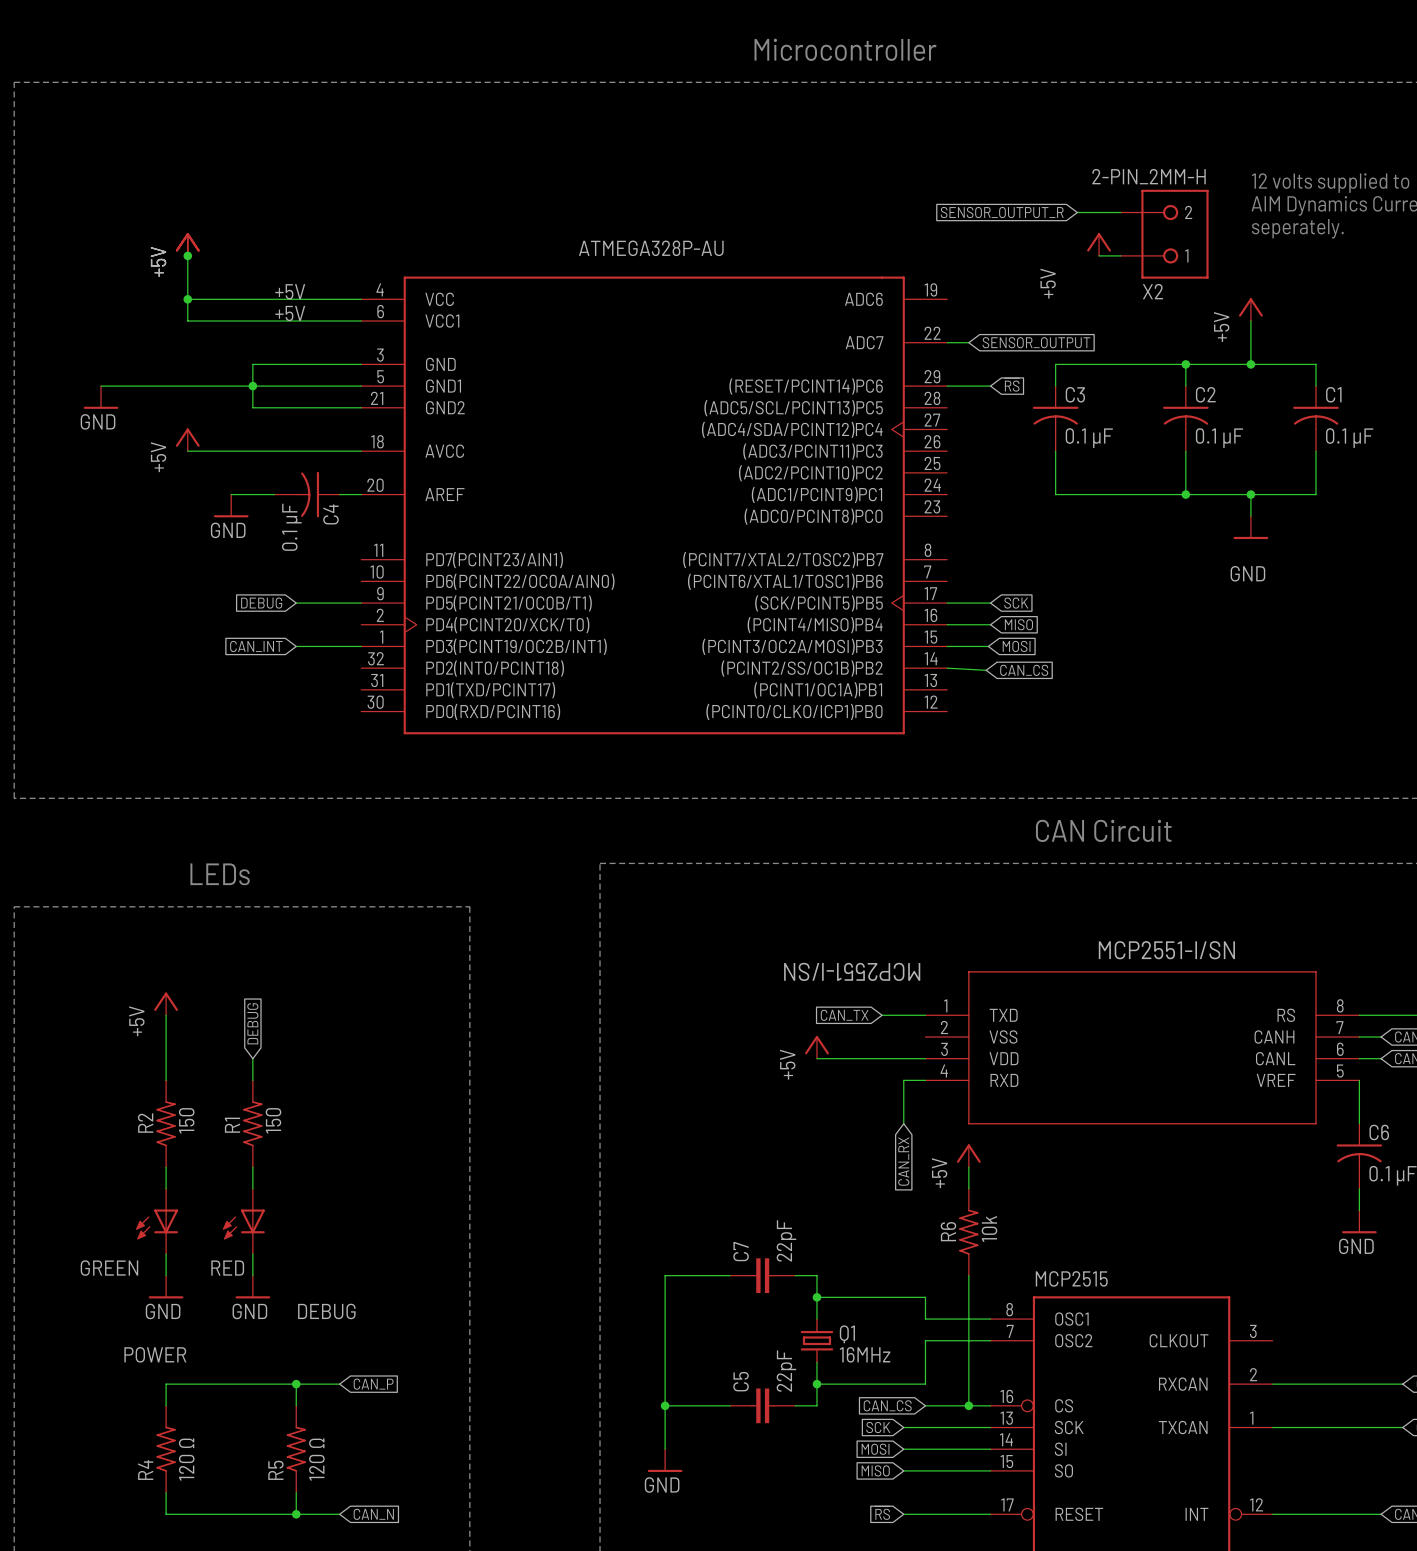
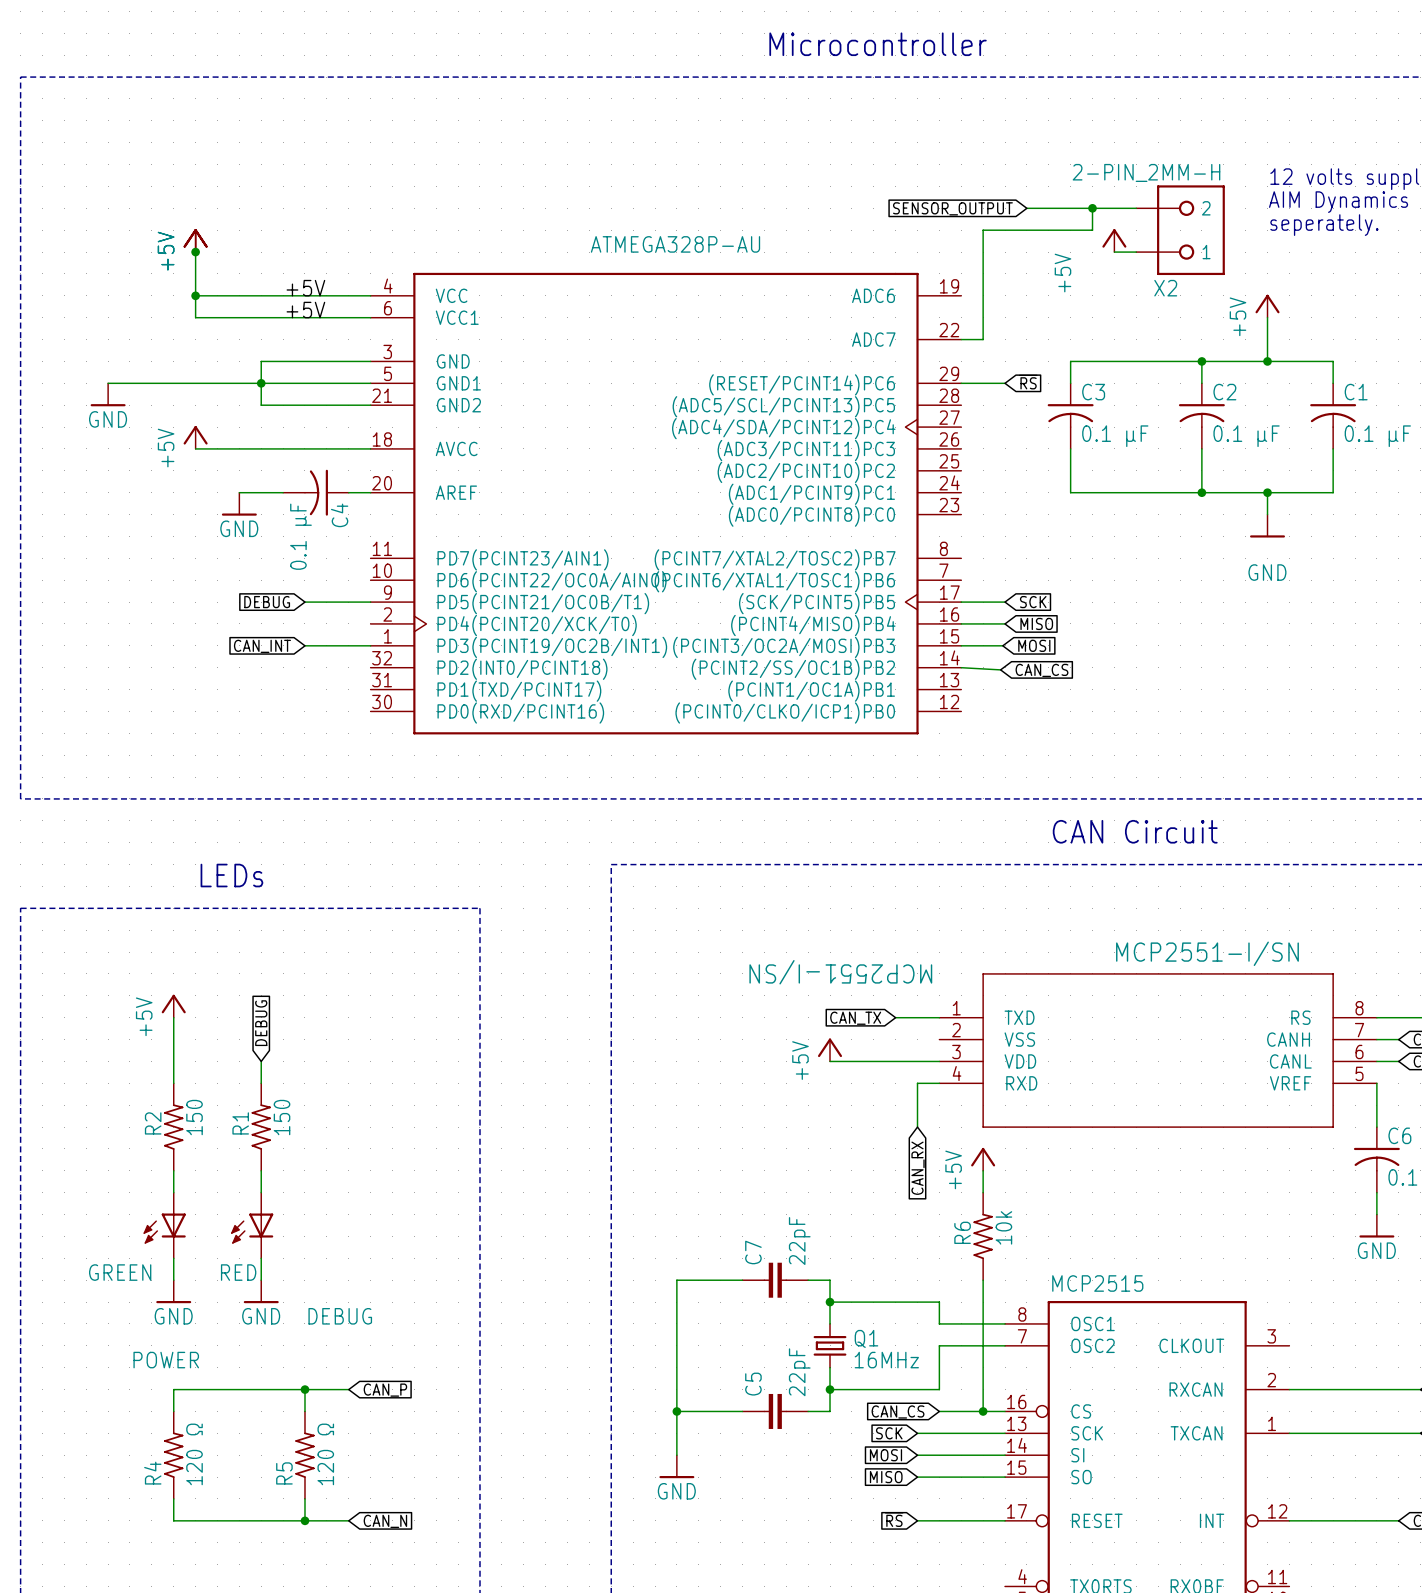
global label: SENSOR_OUTPUT_R (1002, 212) -> none
wire: none -> (1026, 208) (1092, 208) (1092, 230) (983, 230) (983, 339)
junction: none -> (1092, 208)
global label rotation: 0° (1036, 342) -> 180° (952, 208)
global label position: SENSOR_OUTPUT (1036, 342) -> SENSOR_OUTPUT (952, 208)

